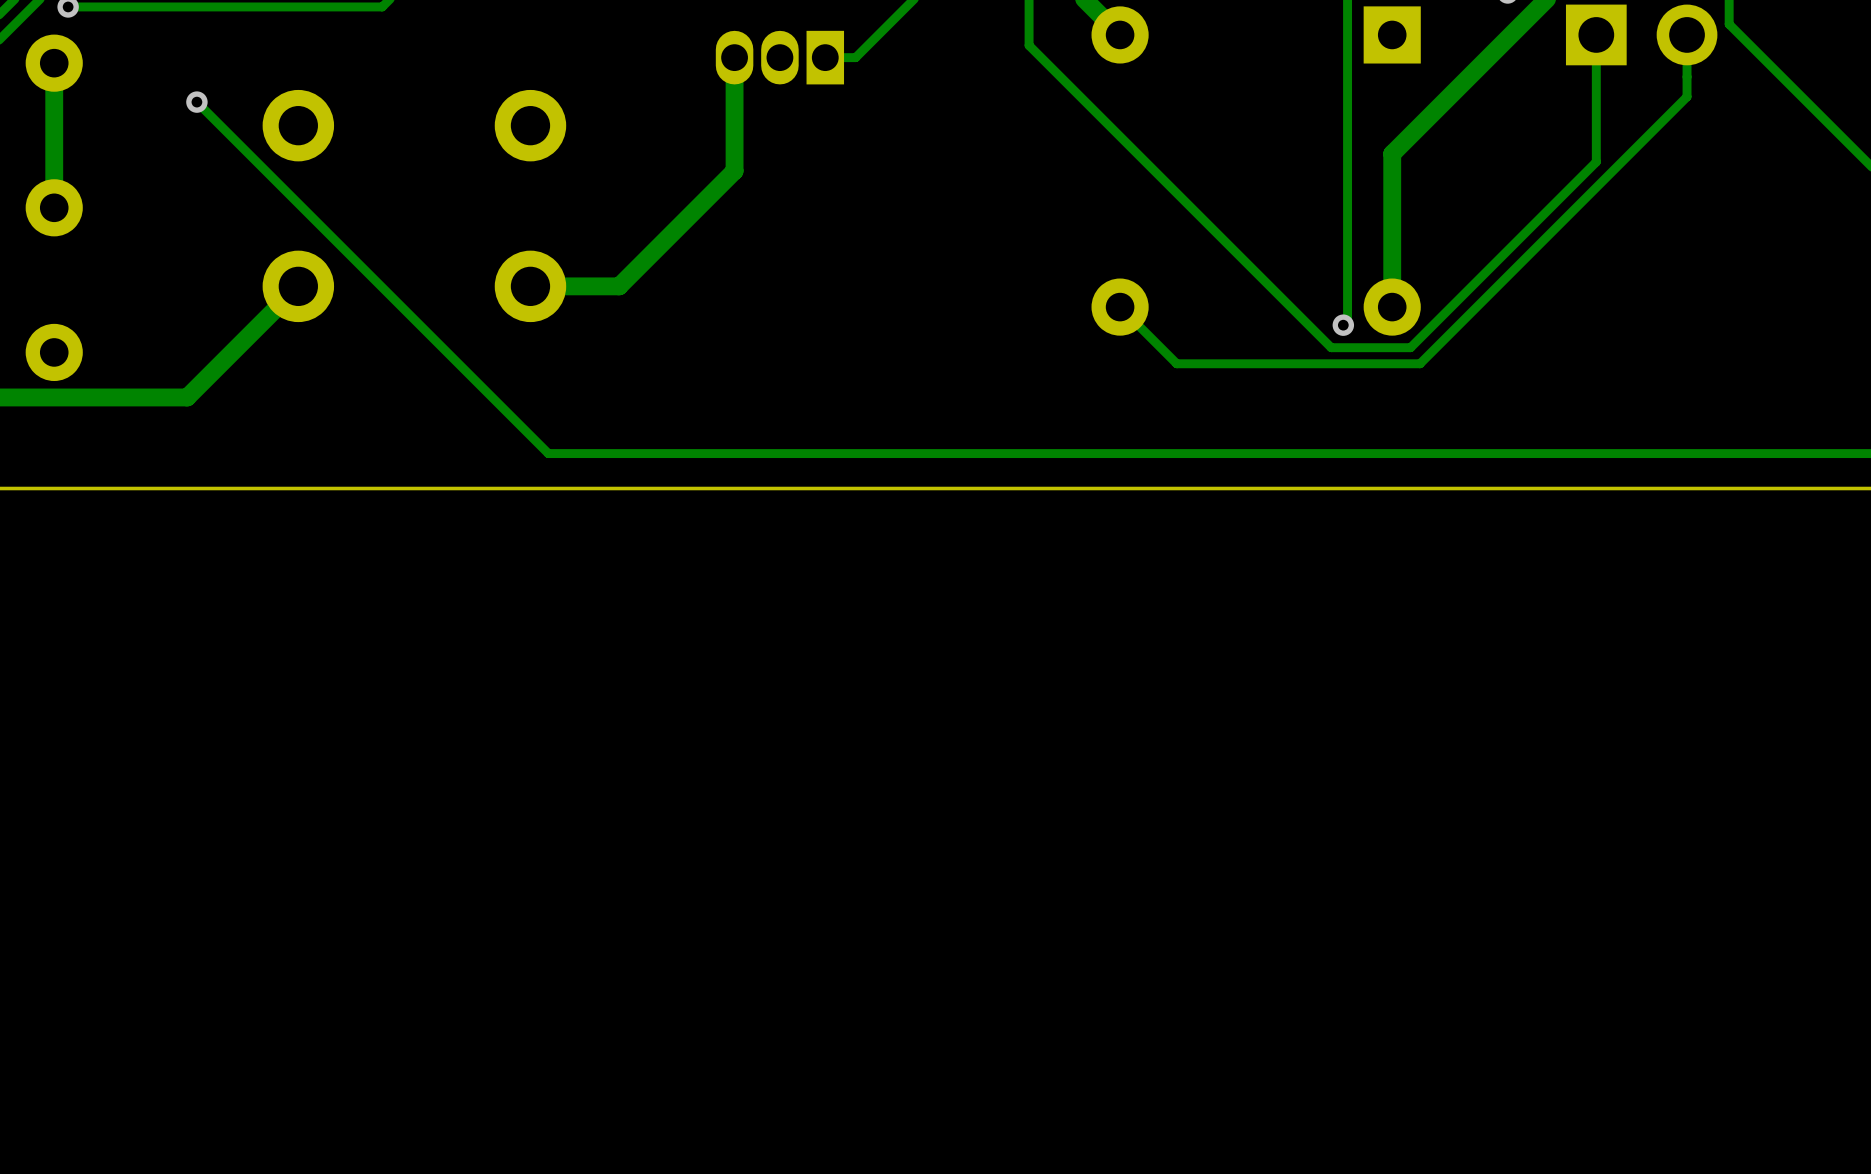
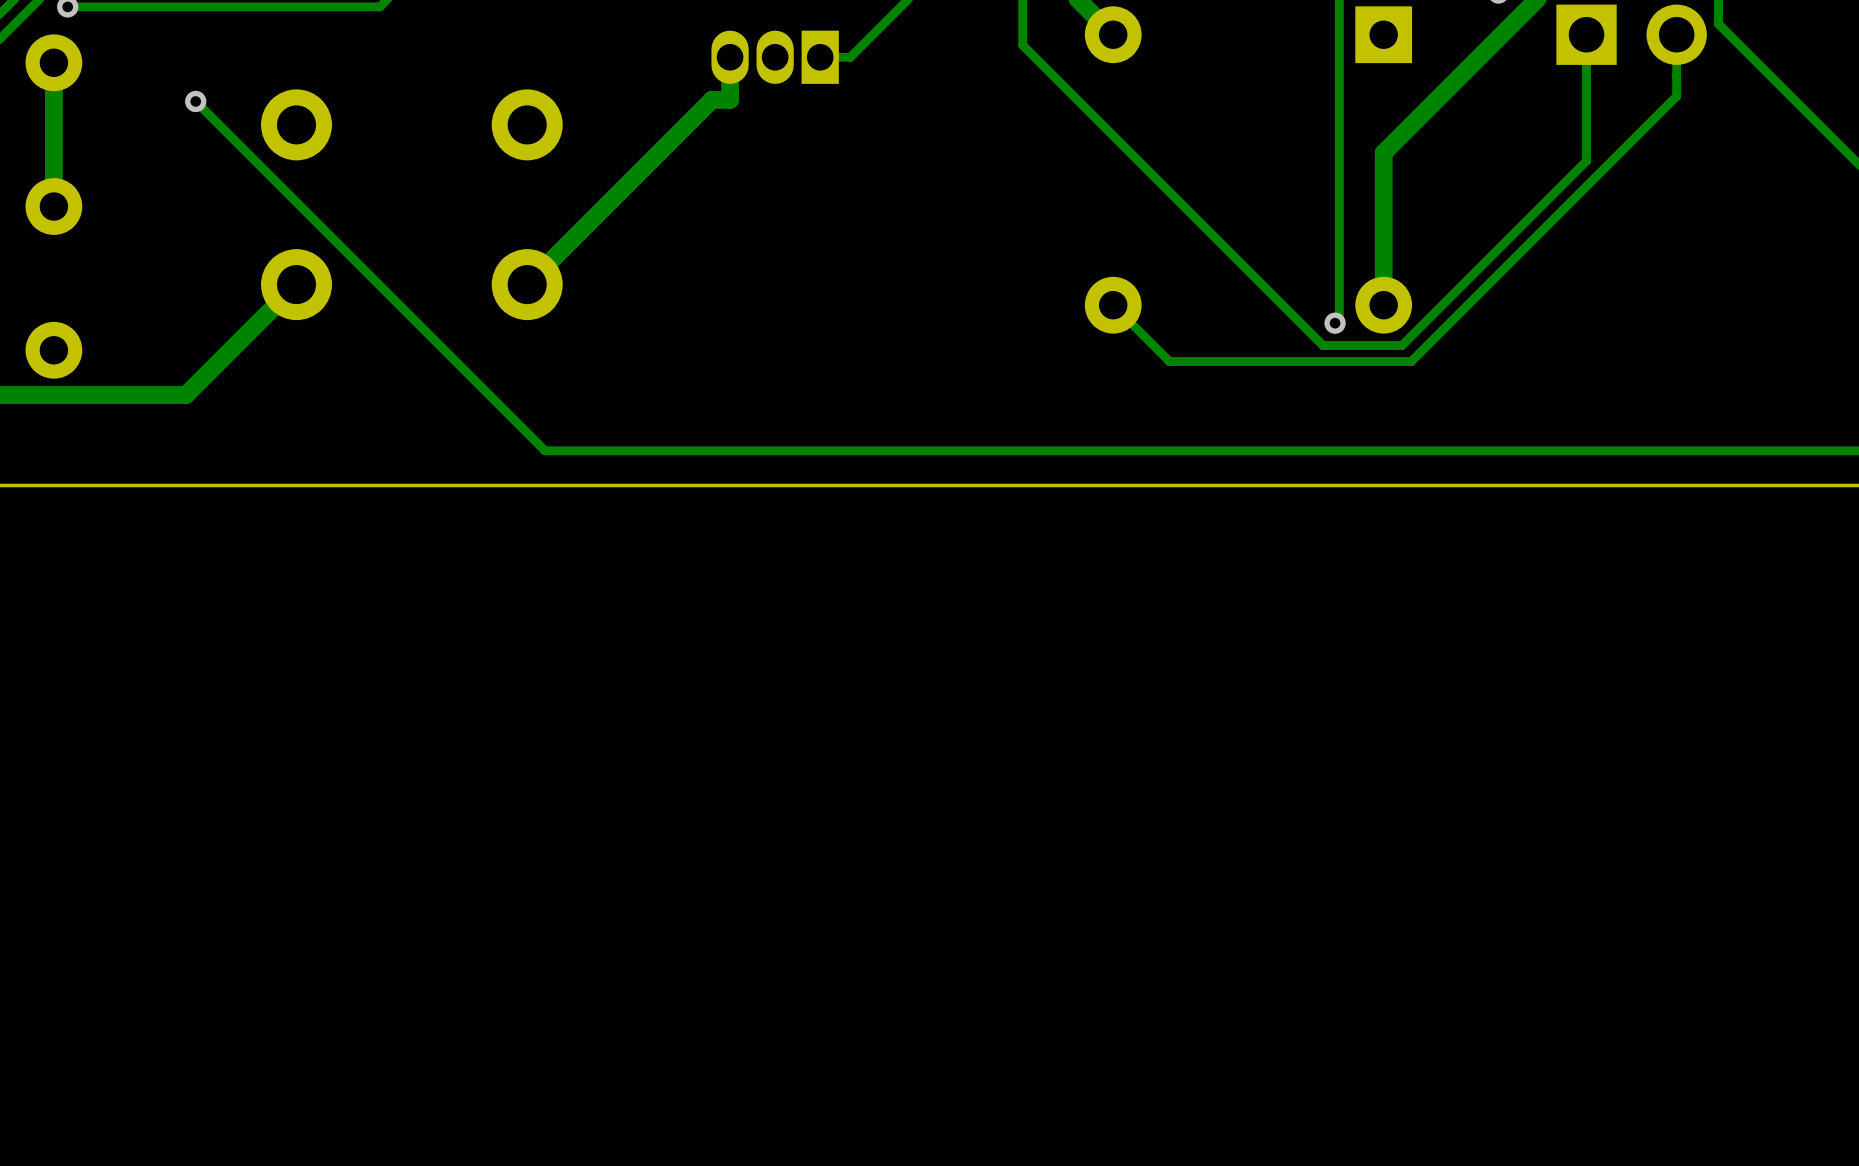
track: (734, 100) (734, 171) (619, 286) (530, 286) -> (730, 99) (711, 99) (527, 284)

